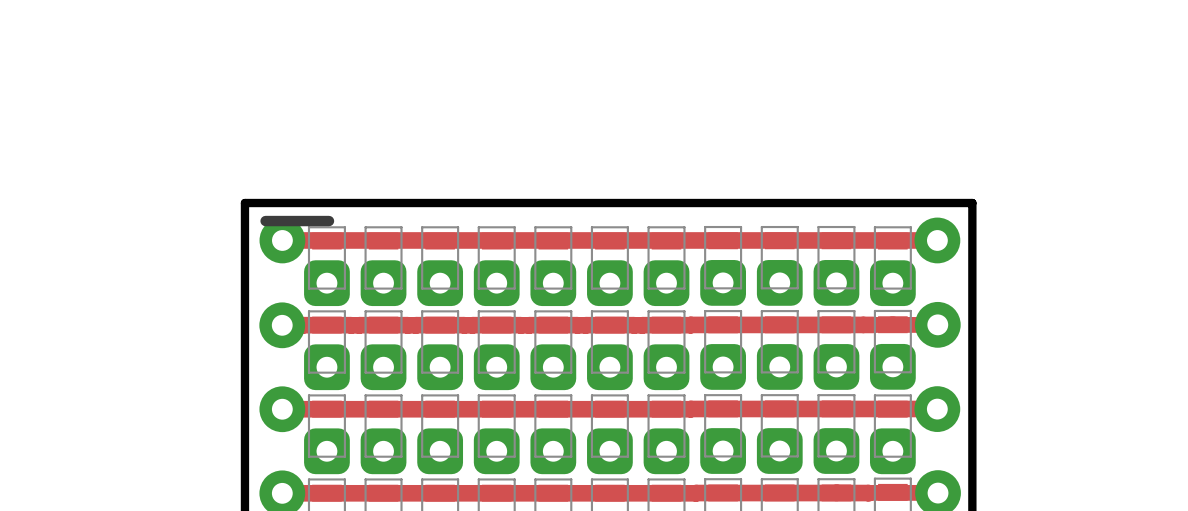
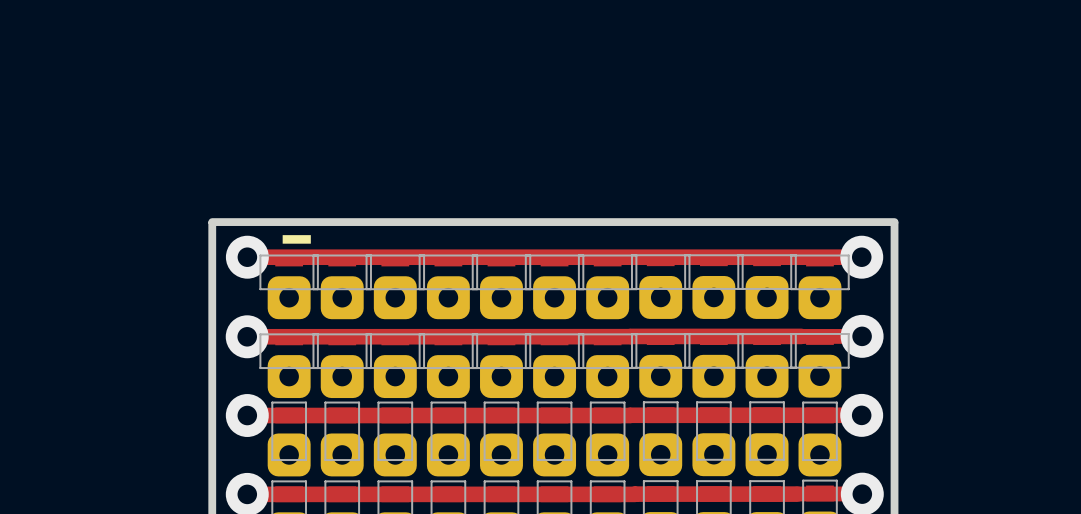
part footprint: [700, 225, 746, 306] -> [630, 250, 691, 319]
part footprint: [756, 225, 803, 306] -> [684, 250, 744, 319]
part footprint: [813, 225, 860, 306] -> [737, 250, 797, 319]
part footprint: [304, 226, 350, 307] -> [259, 250, 319, 320]
part footprint: [360, 226, 407, 307] -> [312, 250, 372, 320]
part footprint: [417, 226, 464, 307] -> [365, 250, 426, 320]
part footprint: [473, 226, 520, 307] -> [418, 250, 479, 320]
part footprint: [530, 226, 577, 307] -> [471, 250, 532, 320]
part footprint: [587, 226, 633, 307] -> [524, 250, 585, 320]
part footprint: [643, 226, 690, 307] -> [577, 250, 638, 320]
part footprint: [869, 226, 916, 307] -> [790, 250, 850, 320]
part footprint: [869, 309, 916, 390] -> [790, 329, 850, 398]
part footprint: [304, 310, 350, 391] -> [259, 329, 319, 399]
part footprint: [360, 310, 407, 391] -> [312, 329, 372, 399]
part footprint: [417, 310, 464, 391] -> [365, 329, 426, 399]
part footprint: [473, 310, 520, 391] -> [418, 329, 479, 399]
part footprint: [530, 310, 577, 391] -> [471, 329, 532, 399]
part footprint: [587, 310, 633, 391] -> [524, 329, 585, 399]
part footprint: [643, 310, 690, 391] -> [577, 329, 638, 399]
part footprint: [700, 310, 746, 390] -> [630, 329, 691, 398]
part footprint: [756, 310, 803, 390] -> [684, 329, 744, 398]
part footprint: [813, 310, 860, 390] -> [737, 329, 797, 398]

